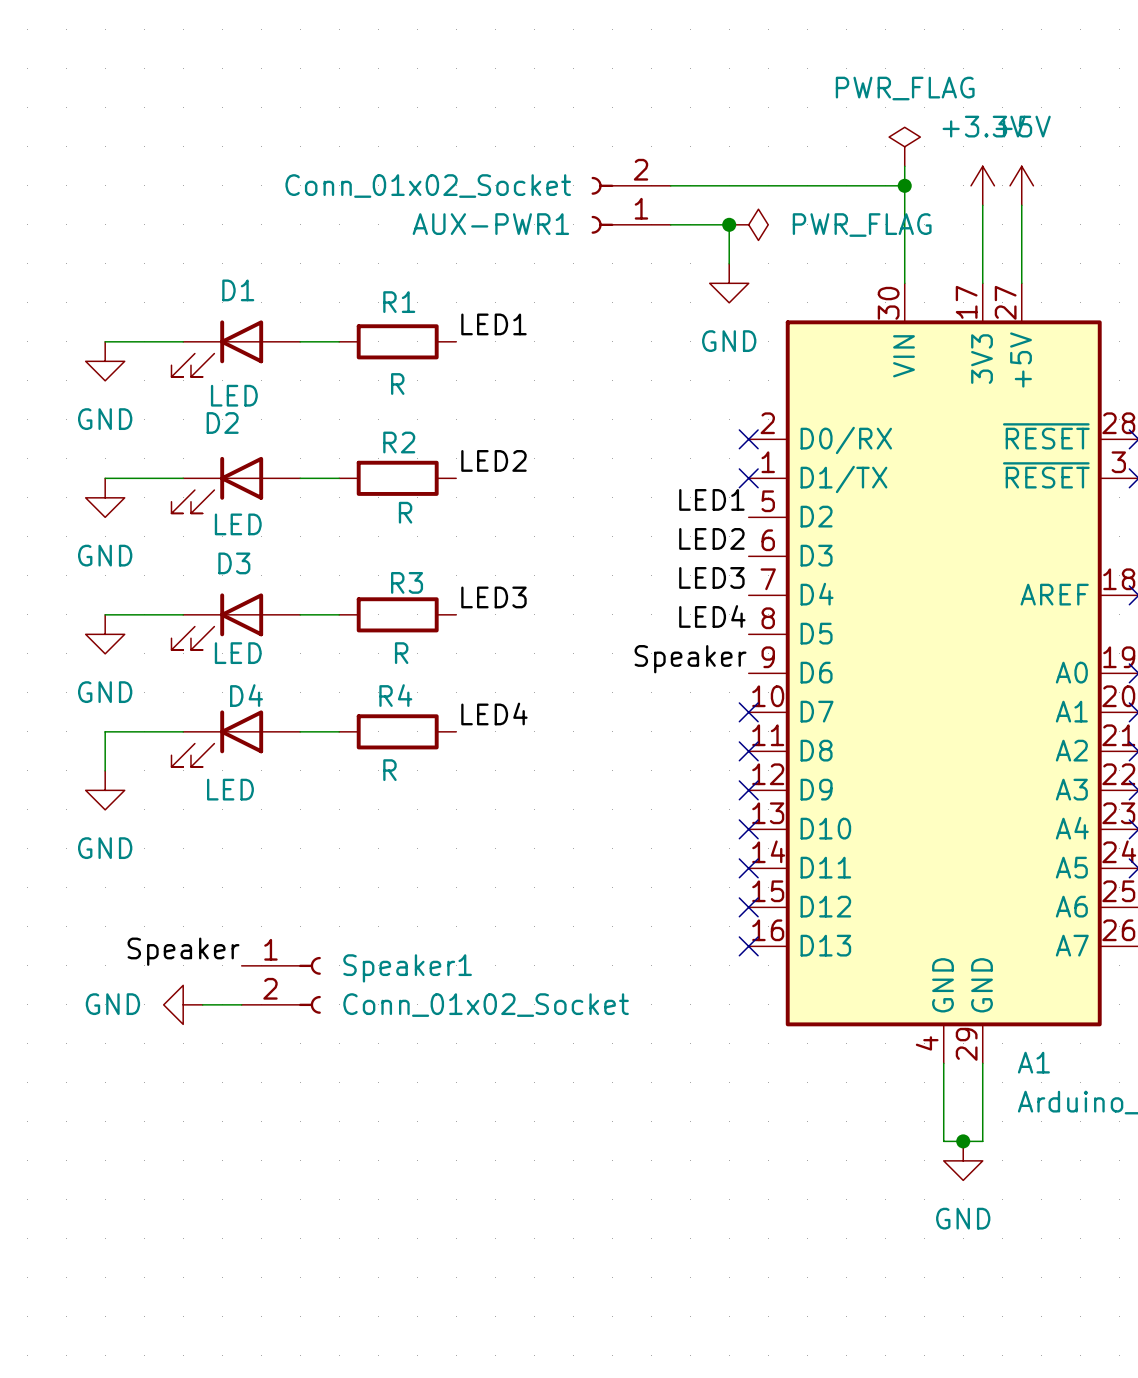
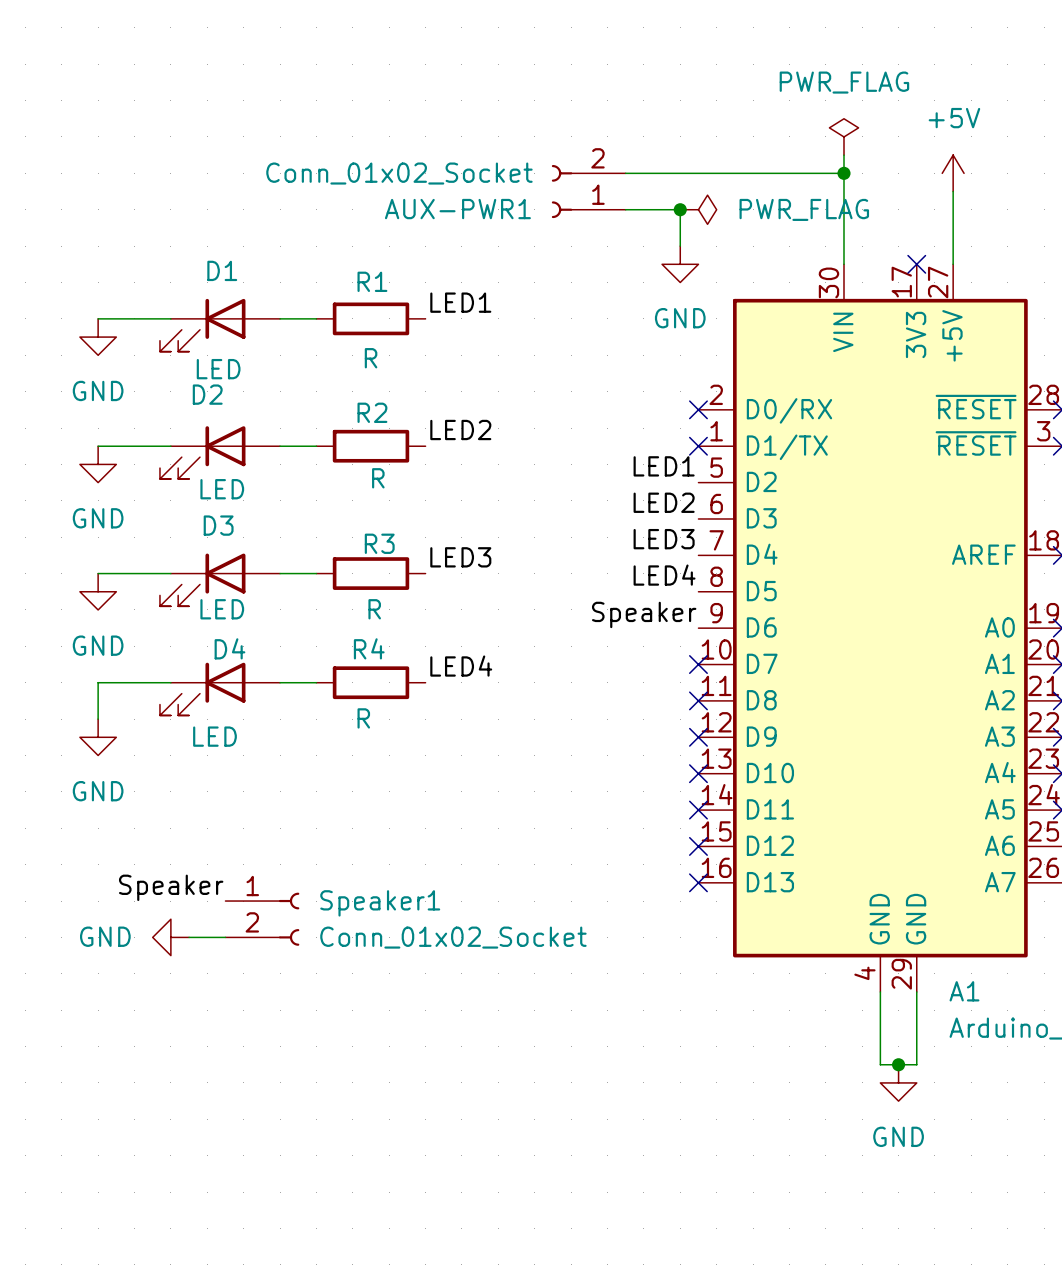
power symbol: +3.3V (982, 185) -> none
wire: (982, 205) (982, 283) -> none
no-connect mark: none -> (916, 264)

